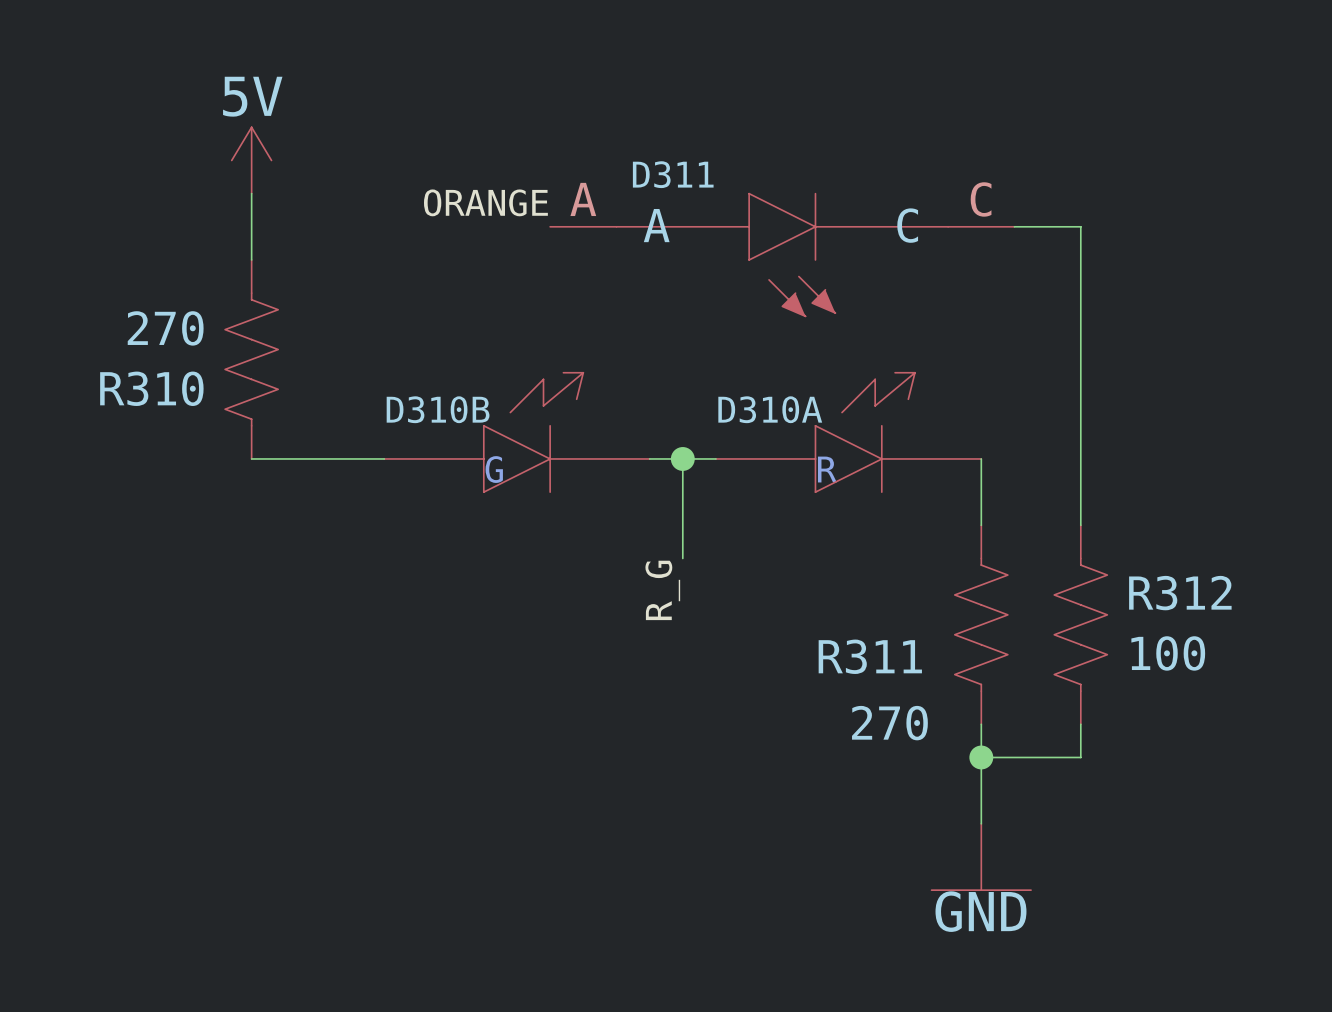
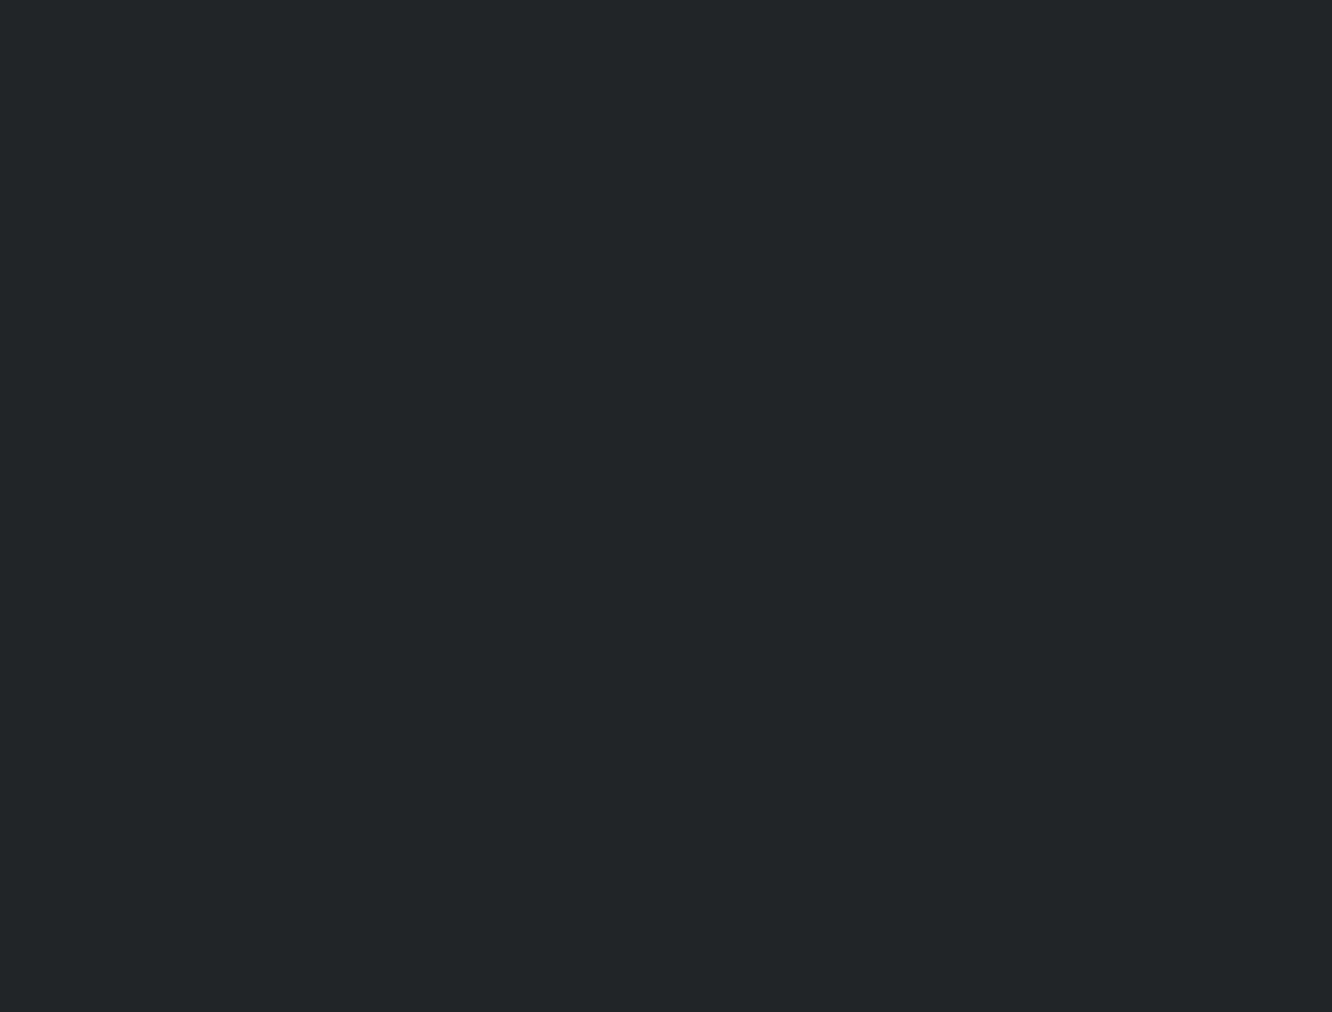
power symbol: 5V (251, 160) -> none
wire: (251, 193) (251, 259) -> none
label: ORANGE (485, 202) -> none
wire: (1014, 226) (1080, 226) (1080, 525) -> none
D311: (782, 255) -> none
R310: 270 (251, 359) -> none
D310B: (516, 432) -> none
D310A: (848, 432) -> none
wire: (251, 458) (384, 458) -> none
wire: (649, 458) (715, 458) -> none
wire: (682, 458) (682, 558) -> none
junction: (682, 458) -> none
wire: (981, 458) (981, 525) -> none
text: G (494, 469) -> none
text: R (827, 469) -> none
label: R_G (662, 590) -> none
R311: 270 (981, 624) -> none
R312: 100 (1080, 624) -> none
wire: (981, 724) (981, 823) -> none
wire: (1080, 724) (1080, 757) (981, 757) -> none
junction: (981, 757) -> none
power symbol: GND (981, 856) -> none

